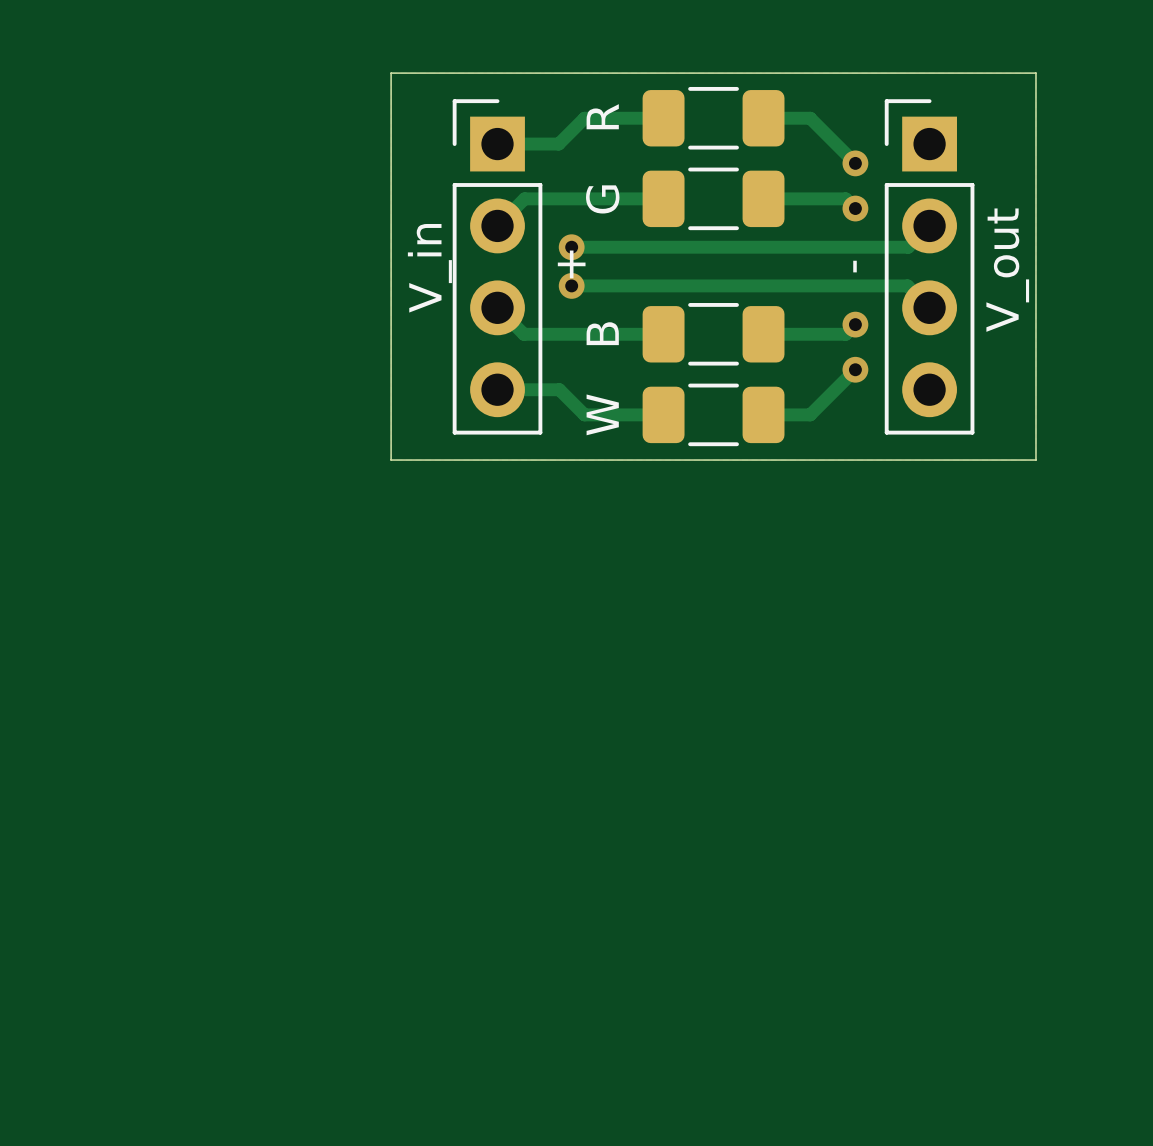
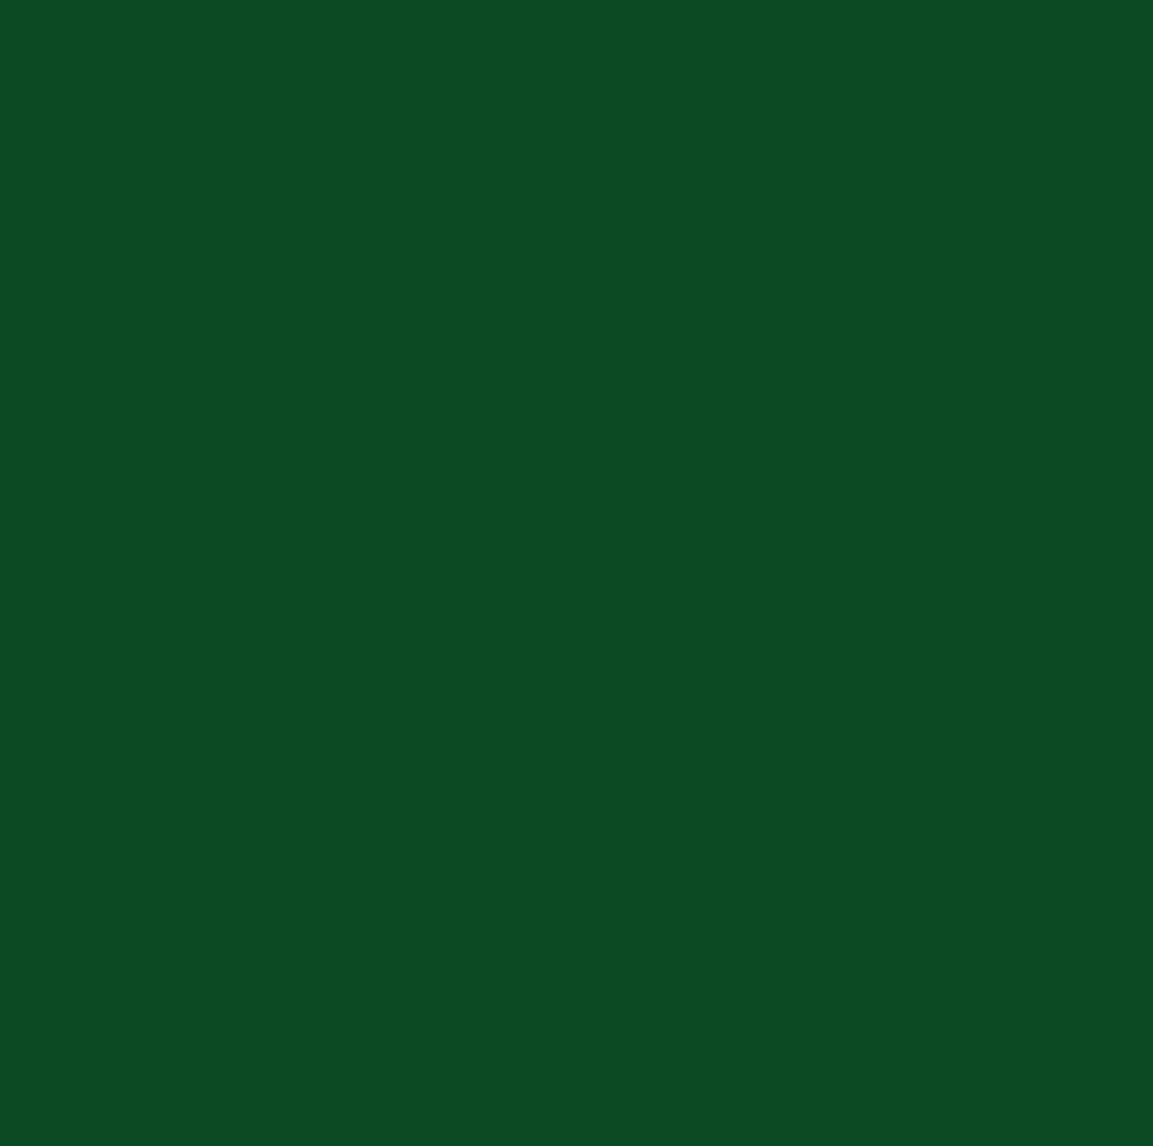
board edge: (391, 73) (391, 460) (1035, 460) (1035, 73) (391, 73) -> none
track: (663, 118) (584, 118) (558, 144) (497, 144) -> none
R: (713, 118) -> none
track: (763, 118) (810, 118) (855, 163) -> none
via: (855, 163) -> none
track: (663, 198) (524, 198) (497, 225) -> none
G: (713, 198) -> none
track: (763, 198) (845, 198) (855, 208) -> none
via: (855, 208) -> none
track: (929, 225) (908, 247) (574, 247) -> none
via: (571, 247) -> none
text: + (571, 264) -> none
V_in: (497, 266) -> none
text: - (855, 266) -> none
V_out: (929, 266) -> none
via: (571, 285) -> none
track: (574, 285) (907, 285) (929, 307) -> none
track: (497, 307) (523, 334) (663, 334) -> none
track: (855, 324) (845, 334) (763, 334) -> none
via: (855, 324) -> none
B: (713, 334) -> none
track: (855, 369) (810, 414) (763, 414) -> none
via: (855, 369) -> none
track: (497, 389) (559, 389) (584, 414) (663, 414) -> none
W: (713, 414) -> none

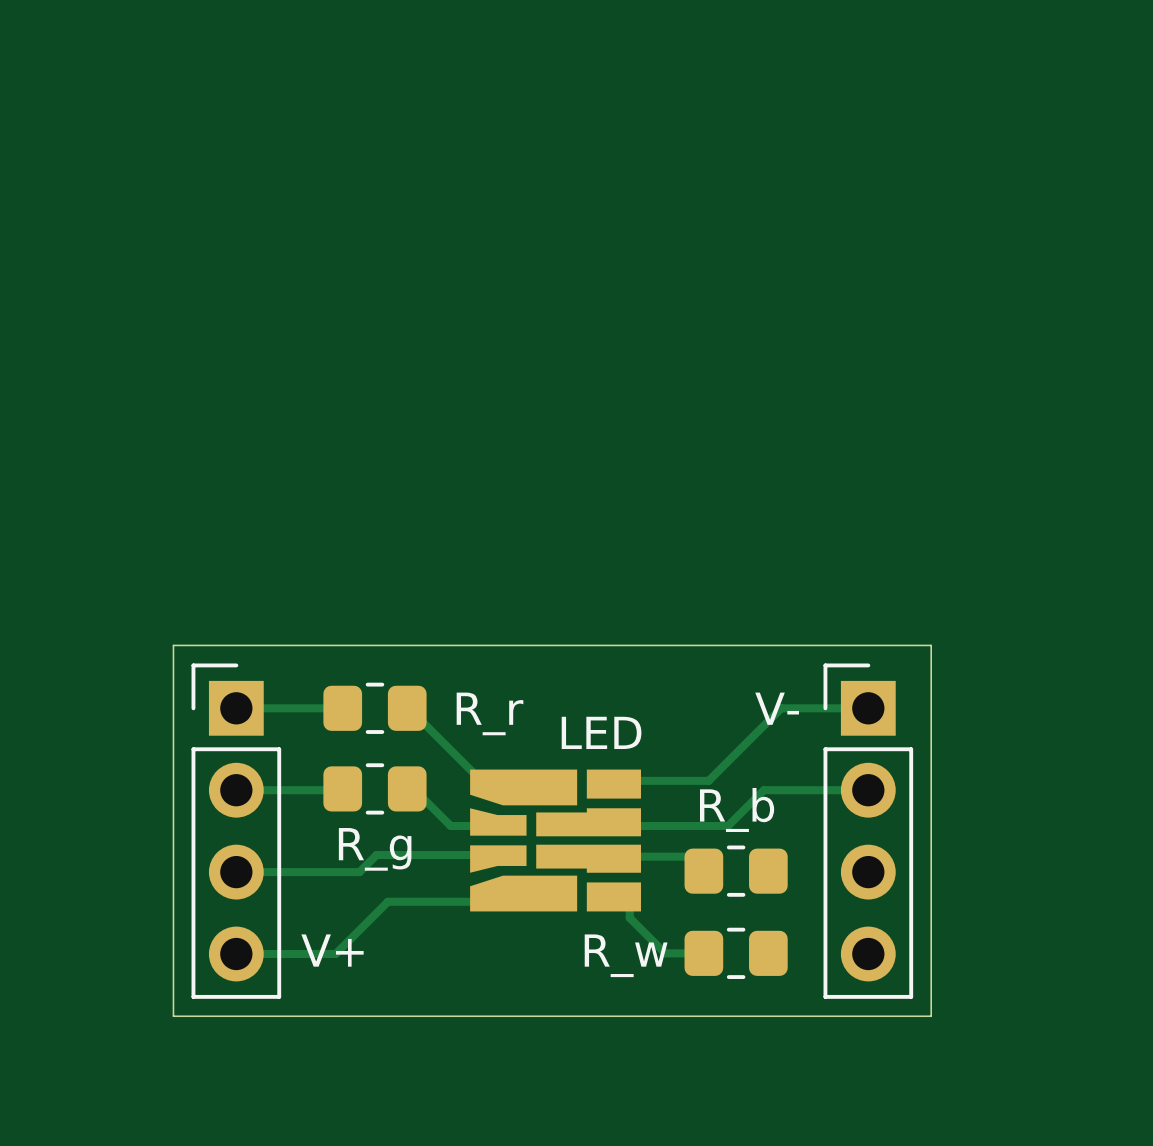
board edge: none -> (173, 645) (931, 645) (931, 1016) (173, 1016) (173, 645)
track: none -> (236, 708) (342, 708)
R_r: none -> (374, 708)
track: none -> (407, 708) (479, 779)
track: none -> (868, 708) (781, 708) (708, 780) (629, 780)
track: none -> (342, 788) (236, 790)
R_g: none -> (374, 788)
track: none -> (407, 788) (413, 788) (450, 826) (479, 826)
track: none -> (868, 790) (763, 790) (728, 826) (629, 826)
V+: none -> (236, 831)
V-: none -> (868, 831)
LED: none -> (555, 840)
track: none -> (479, 855) (376, 855) (359, 872) (236, 872)
track: none -> (629, 856) (689, 856) (703, 871)
R_b: none -> (736, 871)
track: none -> (479, 901) (387, 901) (335, 954) (236, 954)
track: none -> (629, 901) (629, 917) (665, 953) (703, 953)
R_w: none -> (736, 953)

